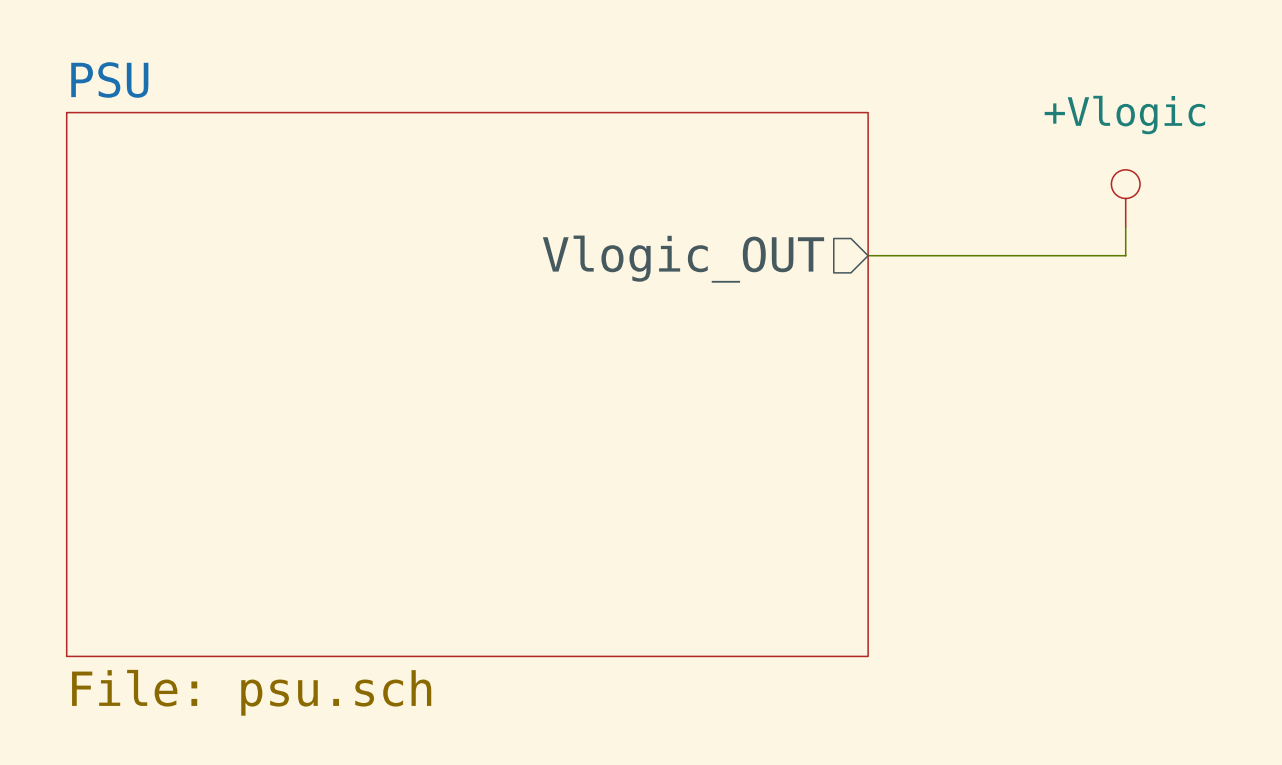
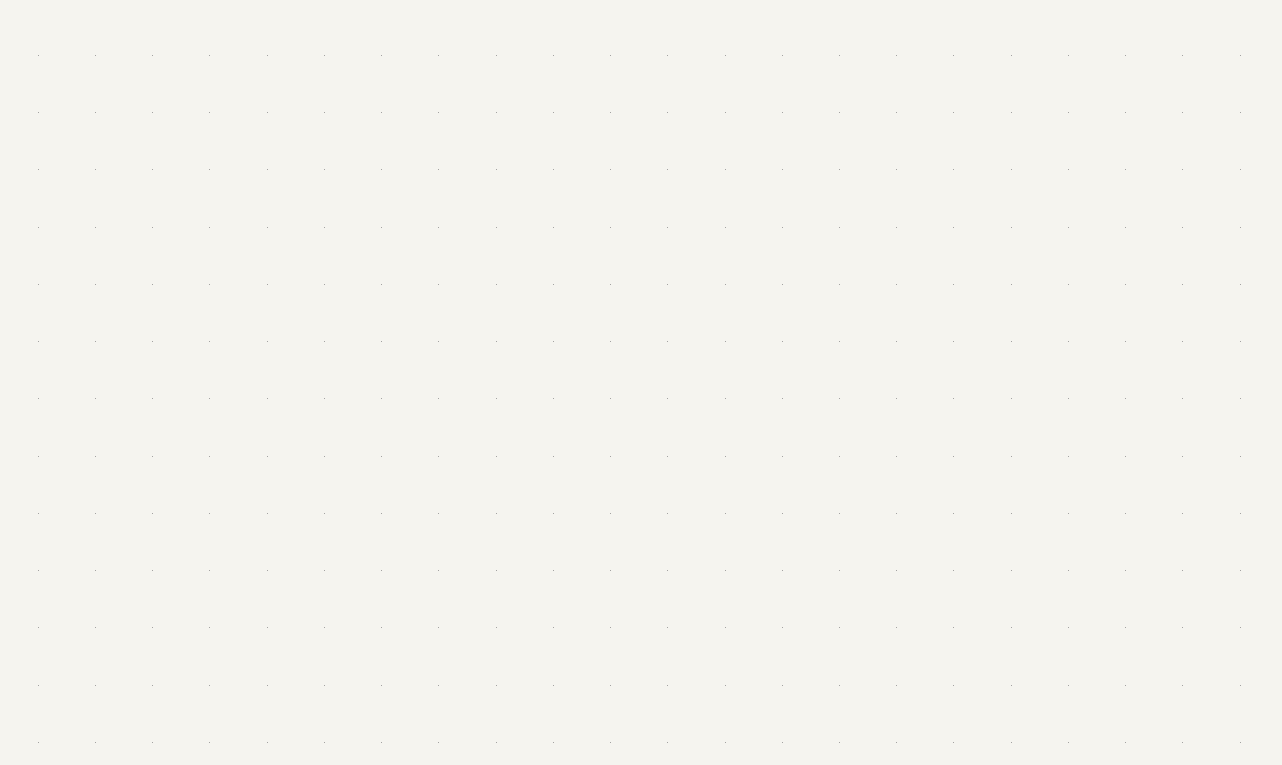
power symbol: +Vlogic (1125, 198) -> none
wire: (1125, 227) (1125, 255) (868, 255) -> none
sheet pin: Vlogic_OUT (683, 259) -> none
sheet PSU: File: psu.sch (467, 384) -> none

